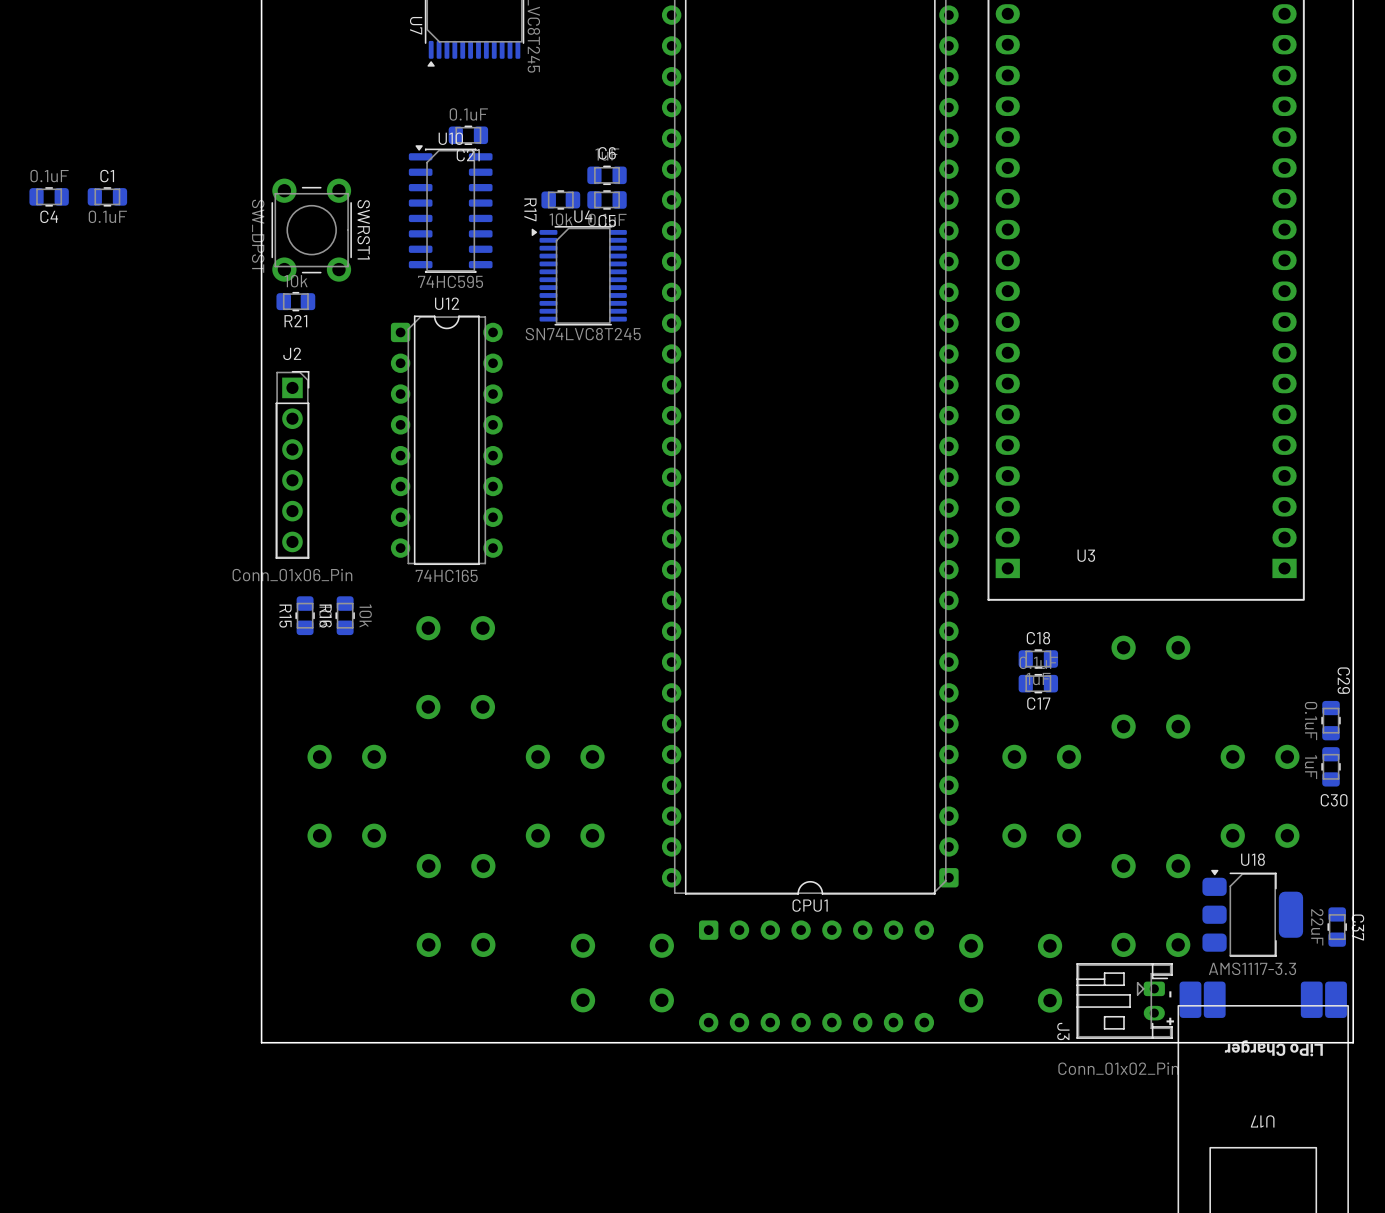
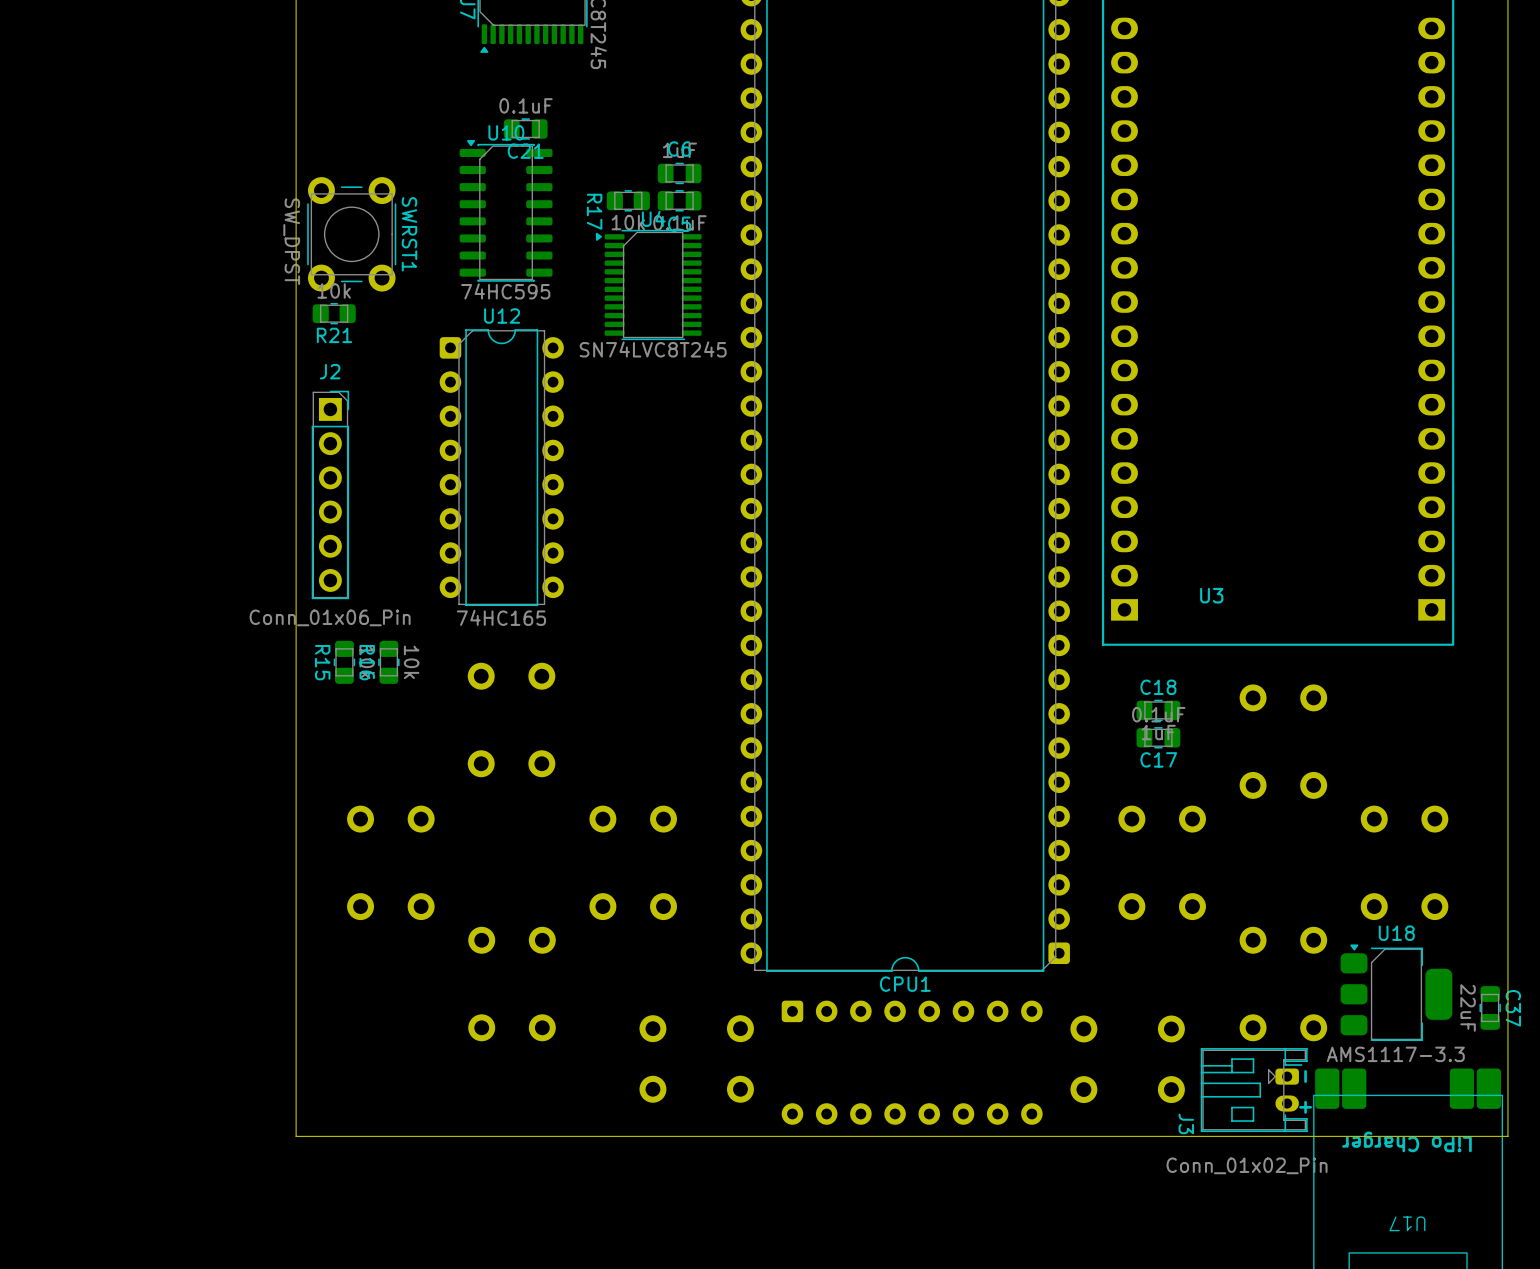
C4: 0.1uF (49, 196) -> none
C1: 0.1uF (107, 196) -> none
C29: 0.1uF (1331, 720) -> none
C30: 1uF (1331, 766) -> none

